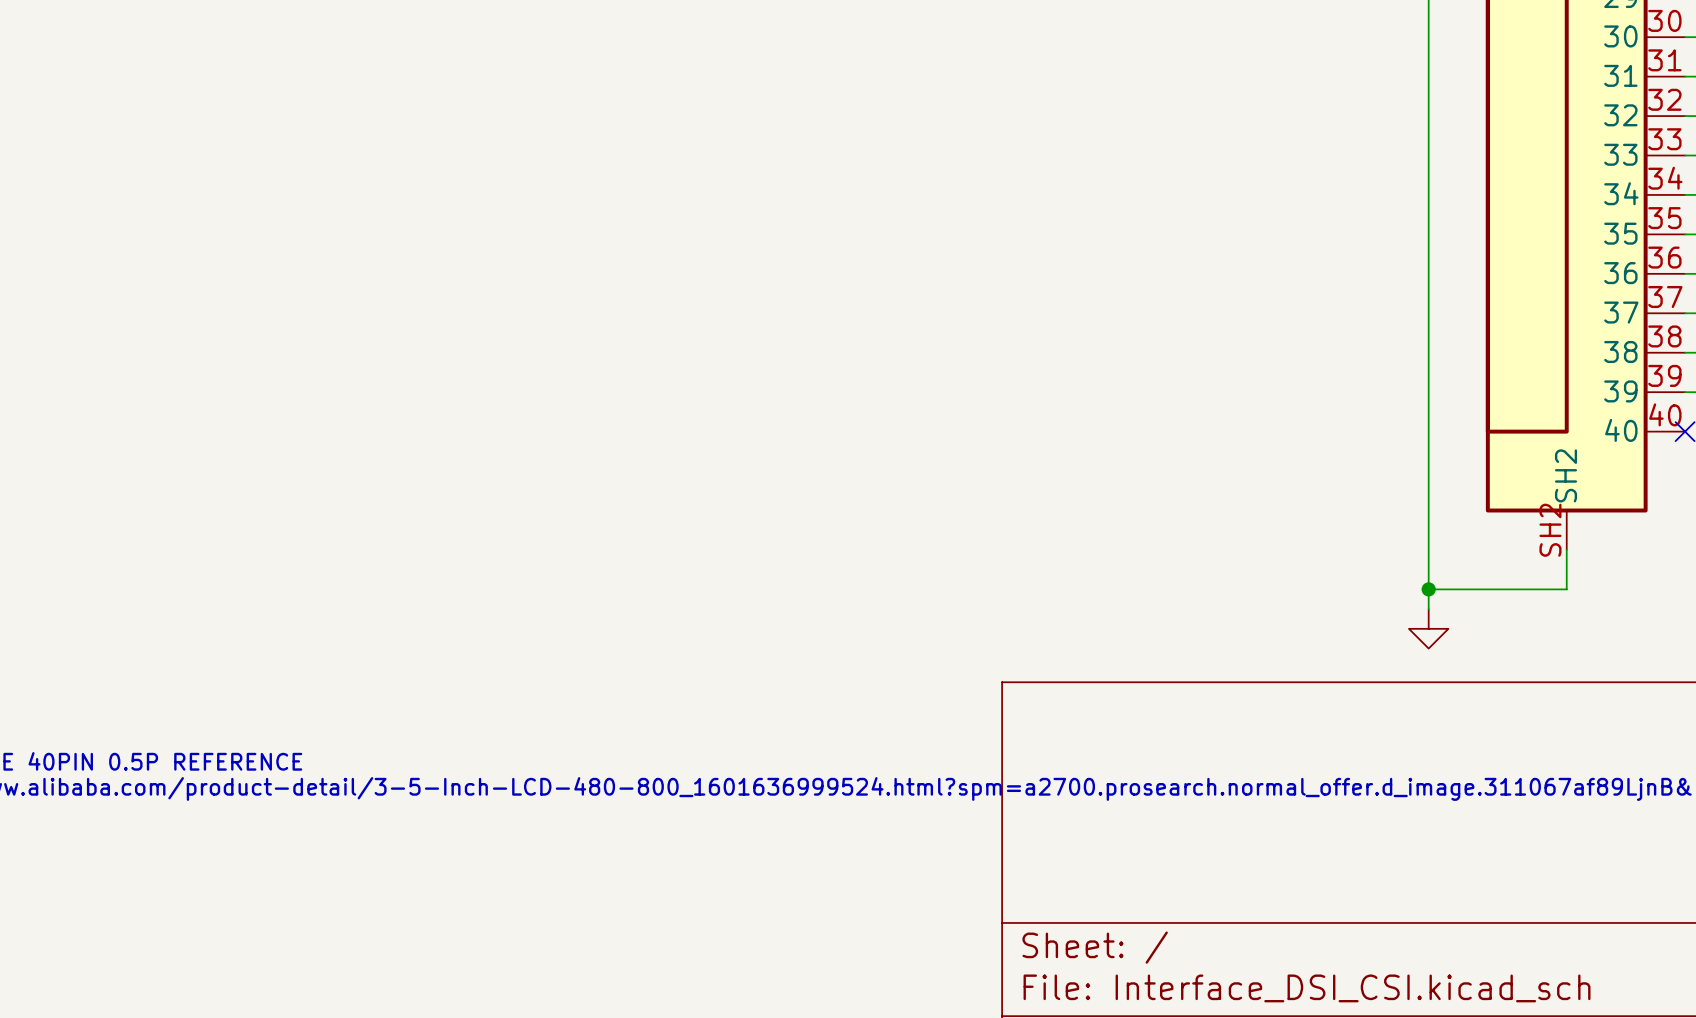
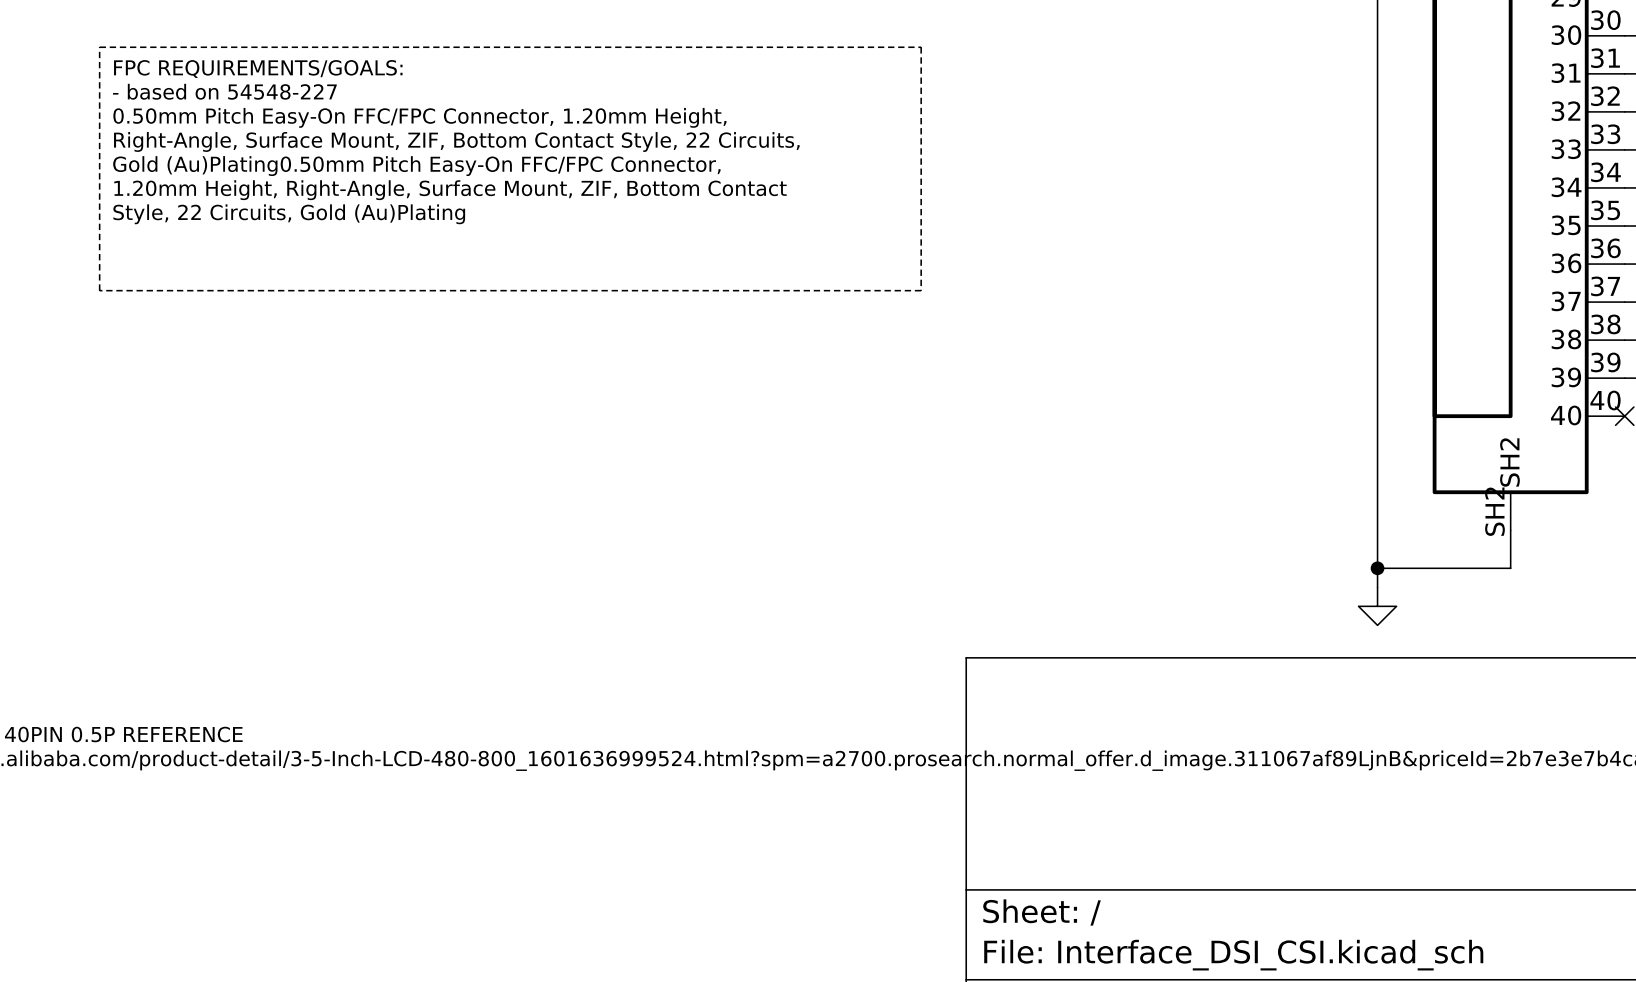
line: none -> (99, 47) (921, 47) (921, 290) (99, 290) (99, 47)
text: none -> FPC REQUIREMENTS/GOALS: (258, 69)
text: none -> - based on 54548-227 (224, 91)
text: none -> 0.50mm Pitch Easy-On FFC/FPC Connector, 1.20mm Height, (419, 117)
text: none -> Right-Angle, Surface Mount, ZIF, Bottom Contact Style, 22 Circuits, (456, 141)
text: none -> Gold (Au)Plating0.50mm Pitch Easy-On FFC/FPC Connector, (416, 166)
text: none -> 1.20mm Height, Right-Angle, Surface Mount, ZIF, Bottom Contact (450, 190)
text: none -> Style, 22 Circuits, Gold (Au)Plating (289, 214)

